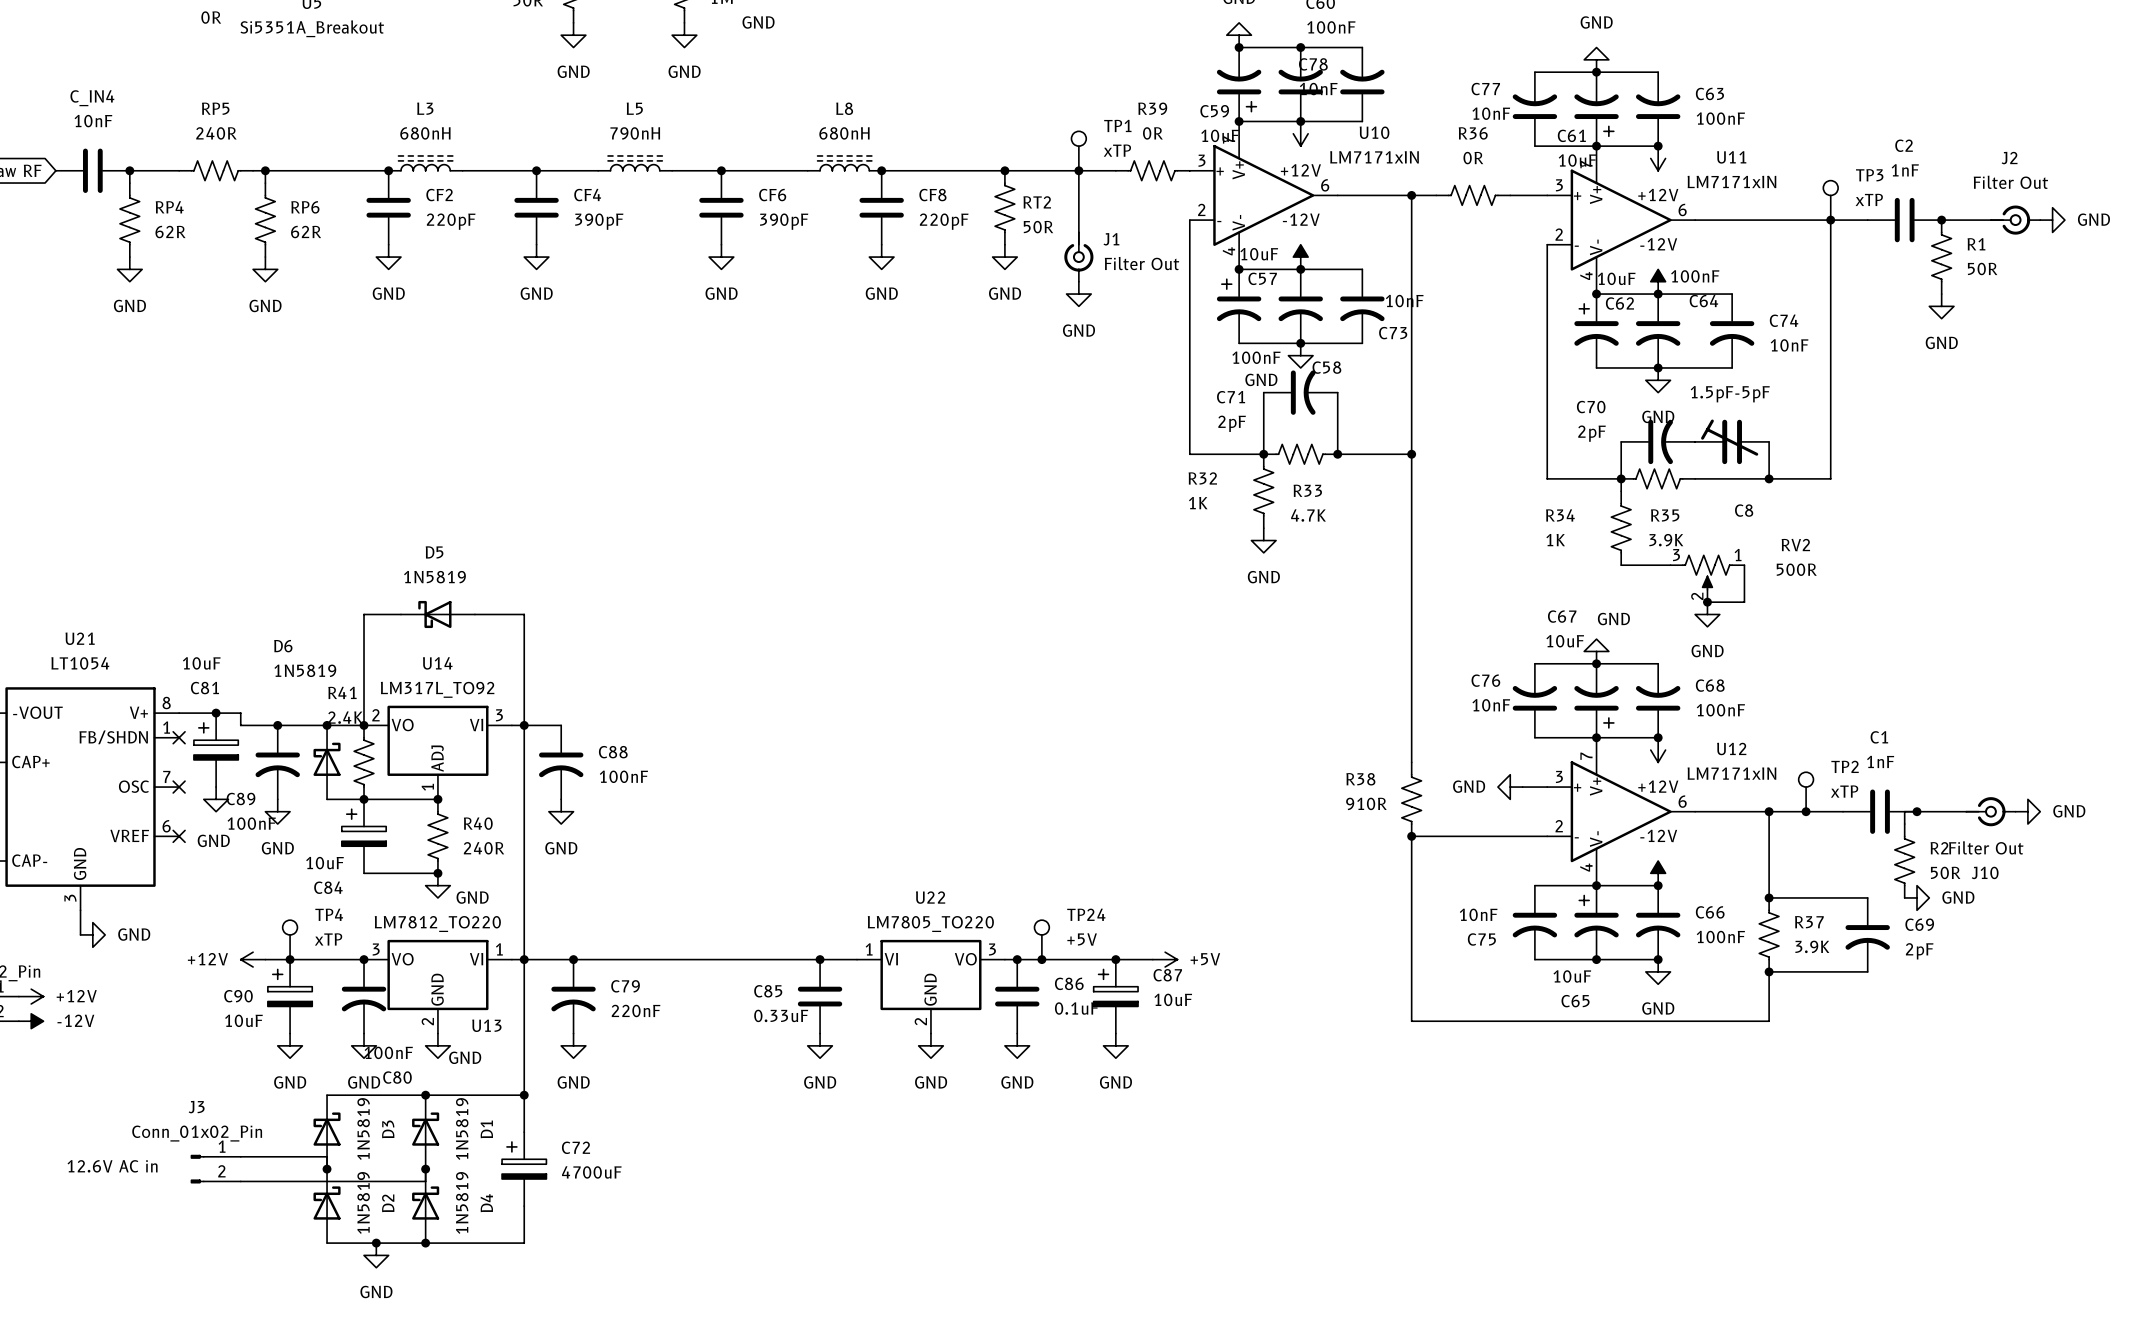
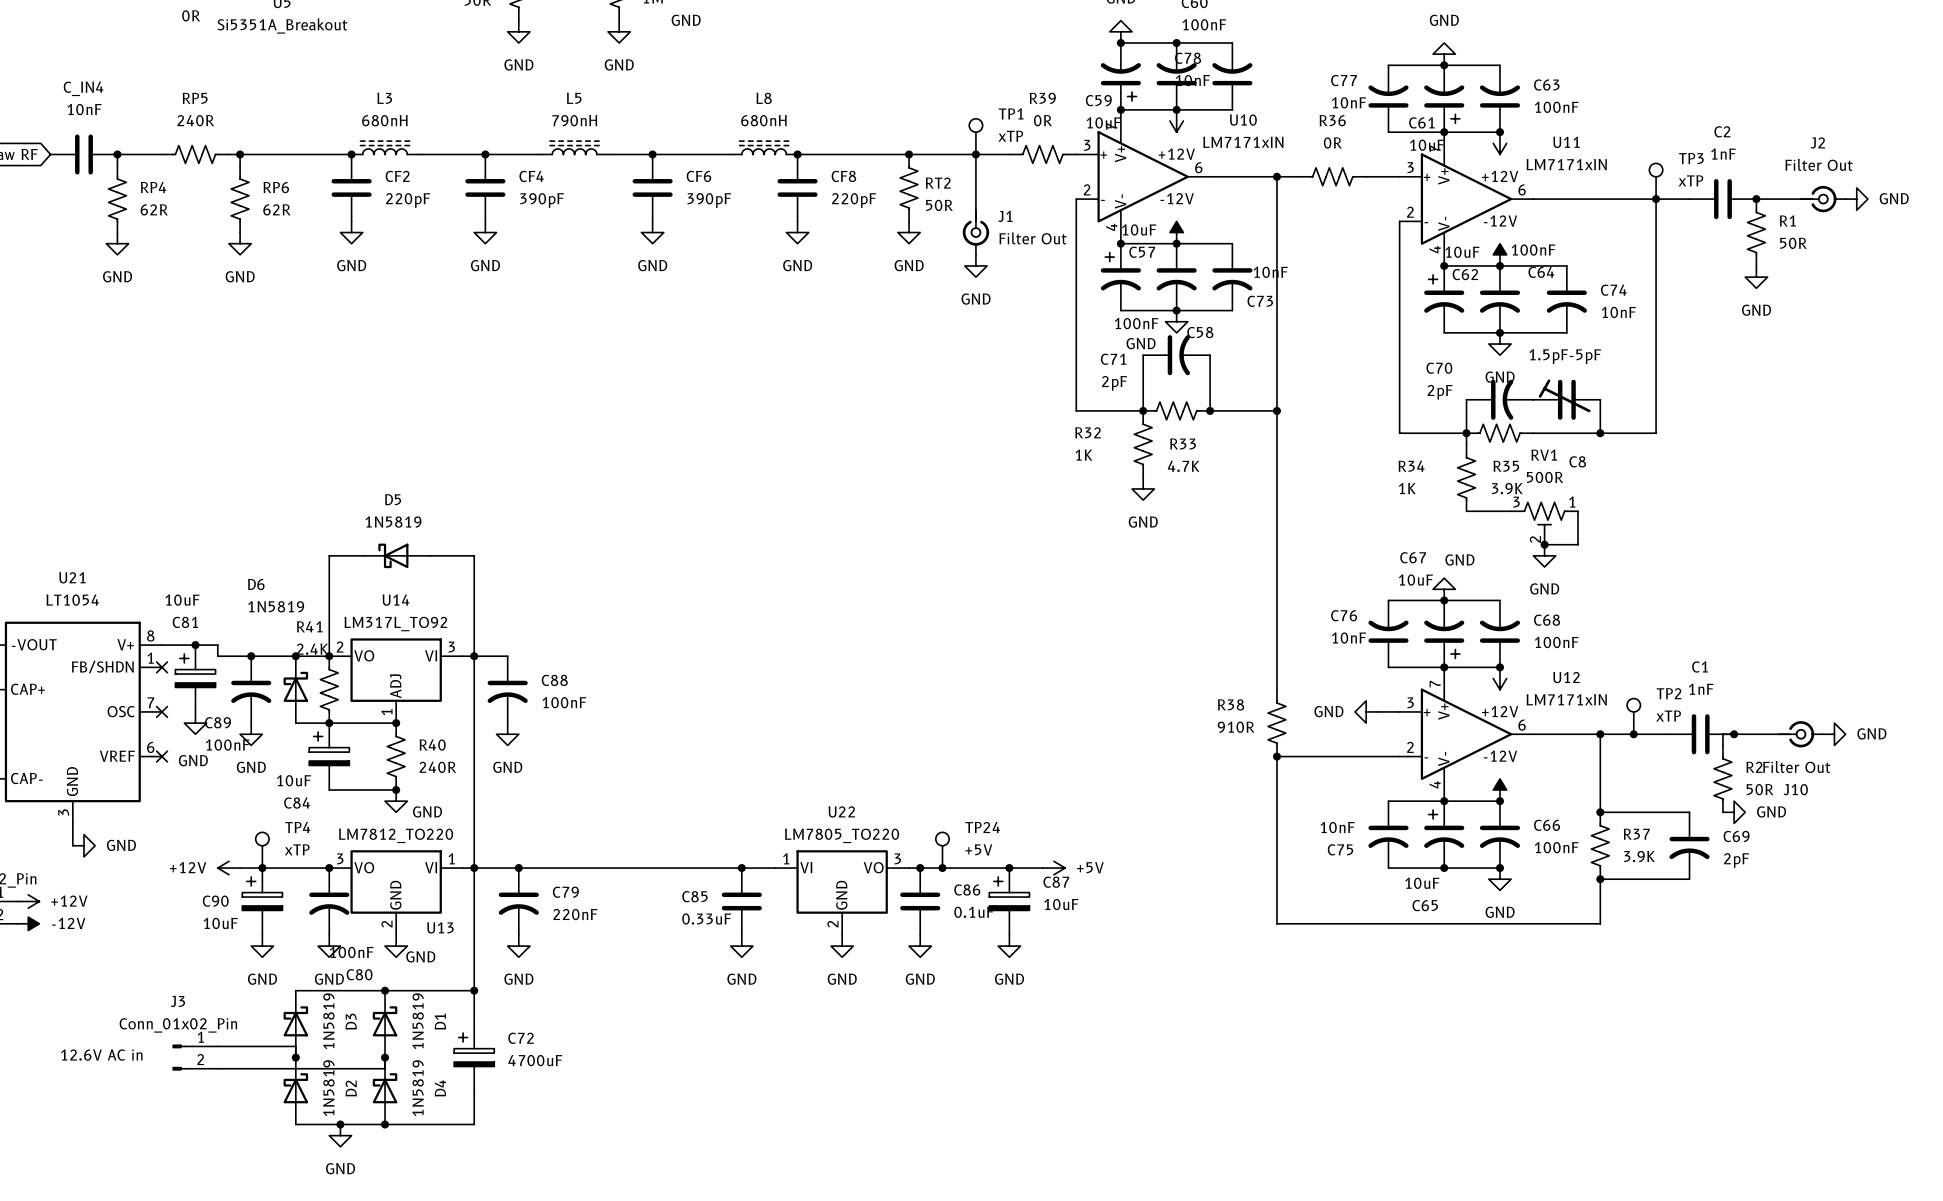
RV2: 500R (1707, 578) -> none
RV1: none -> 500R (1544, 523)

